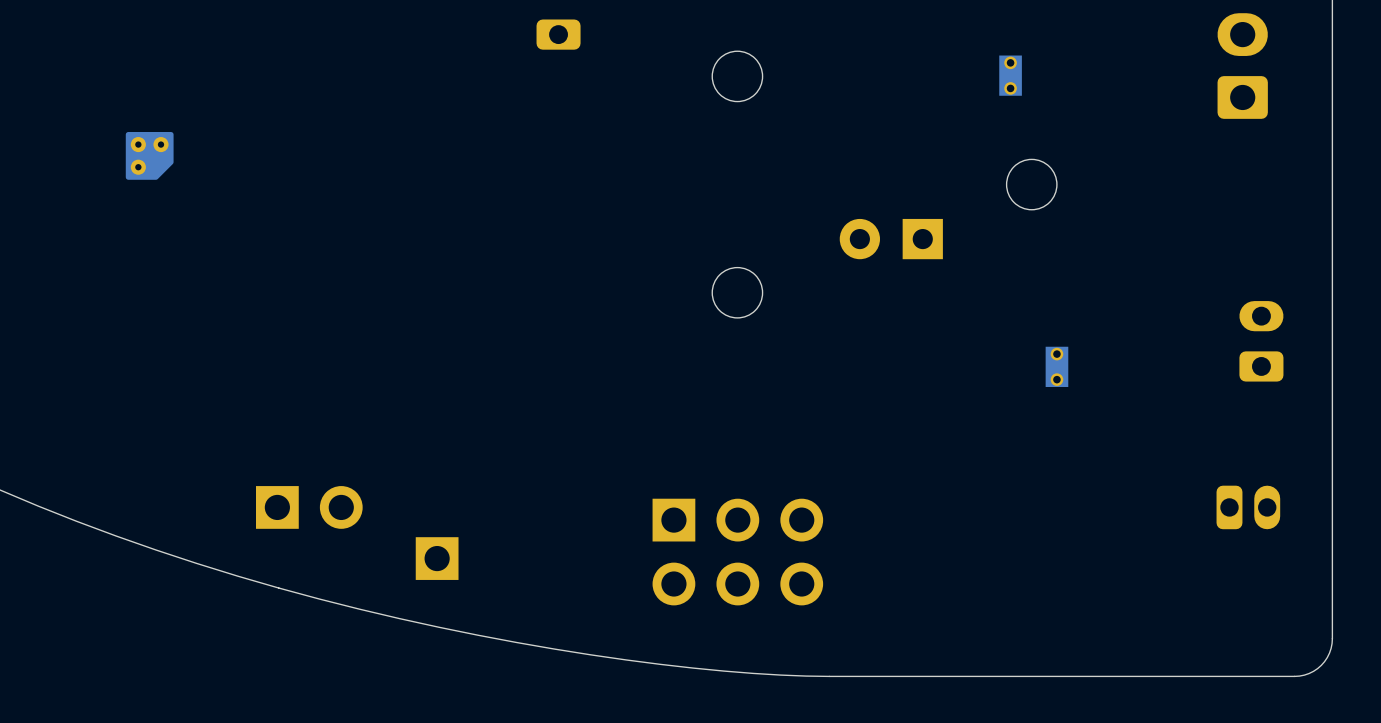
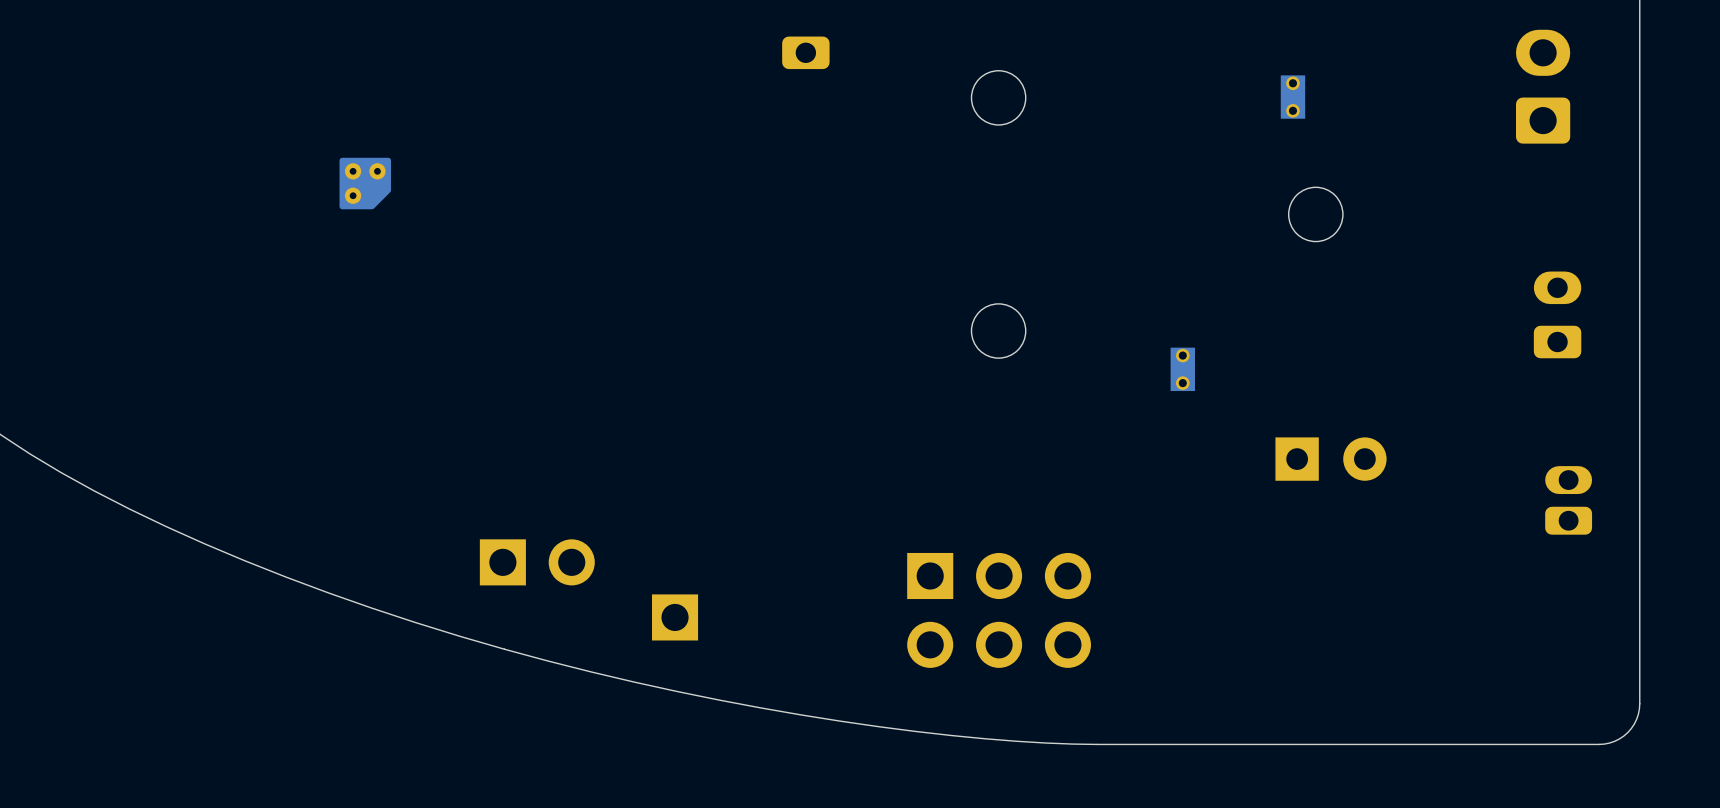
part rotation: 0° (891, 239) -> 180° (1331, 459)
part position: (891, 239) -> (1331, 459)
part position: (1261, 341) -> (1557, 314)
part position: (1056, 366) -> (1182, 369)
part rotation: 0° (1248, 507) -> 90° counterclockwise (1568, 500)
part position: (1248, 507) -> (1568, 500)

